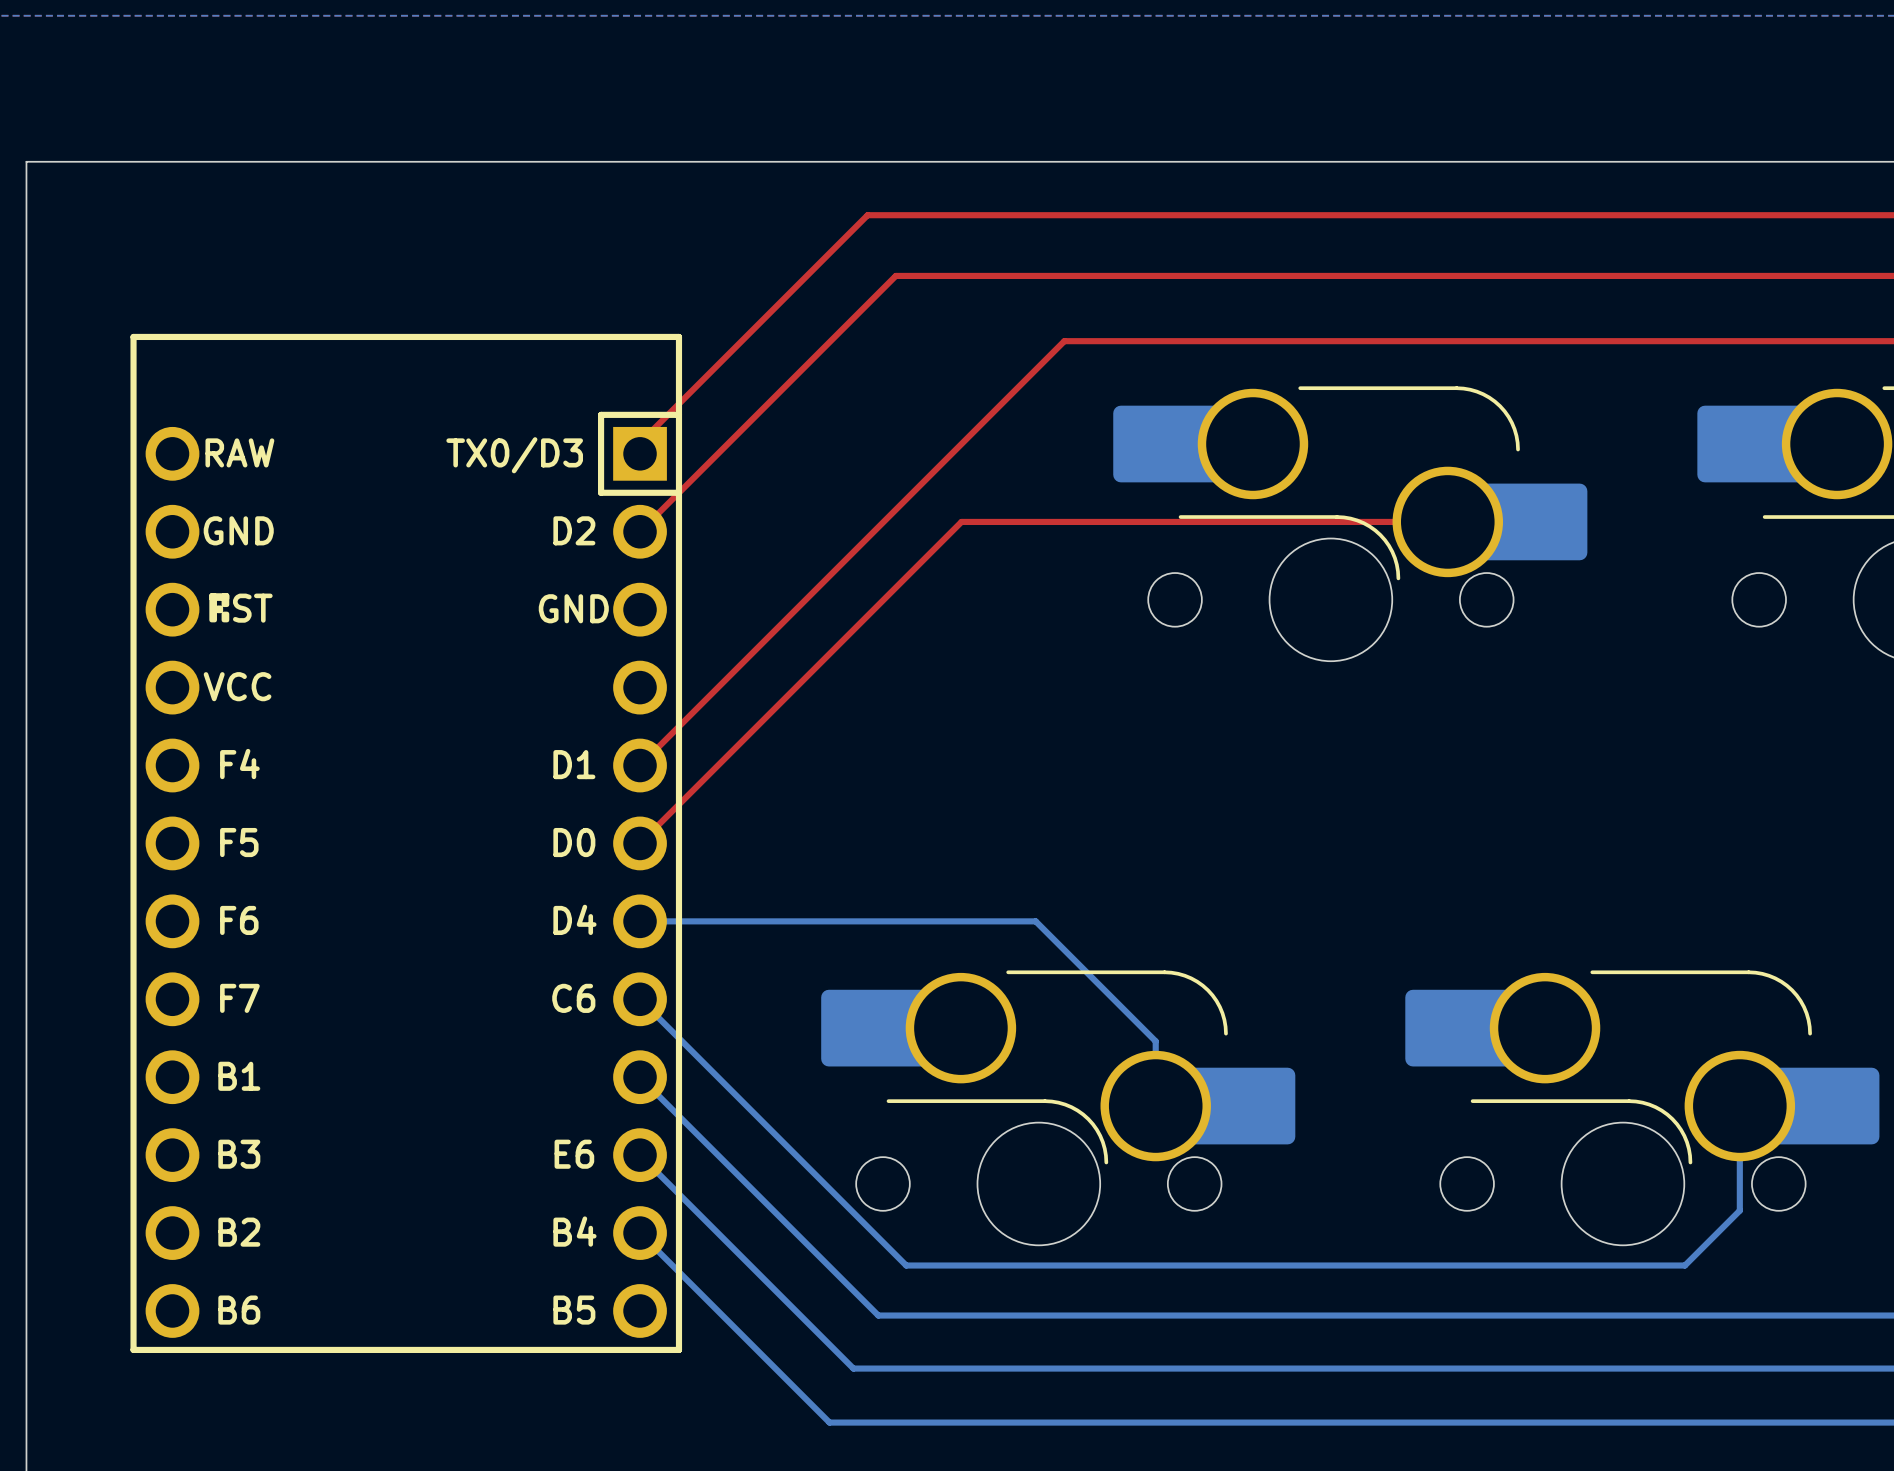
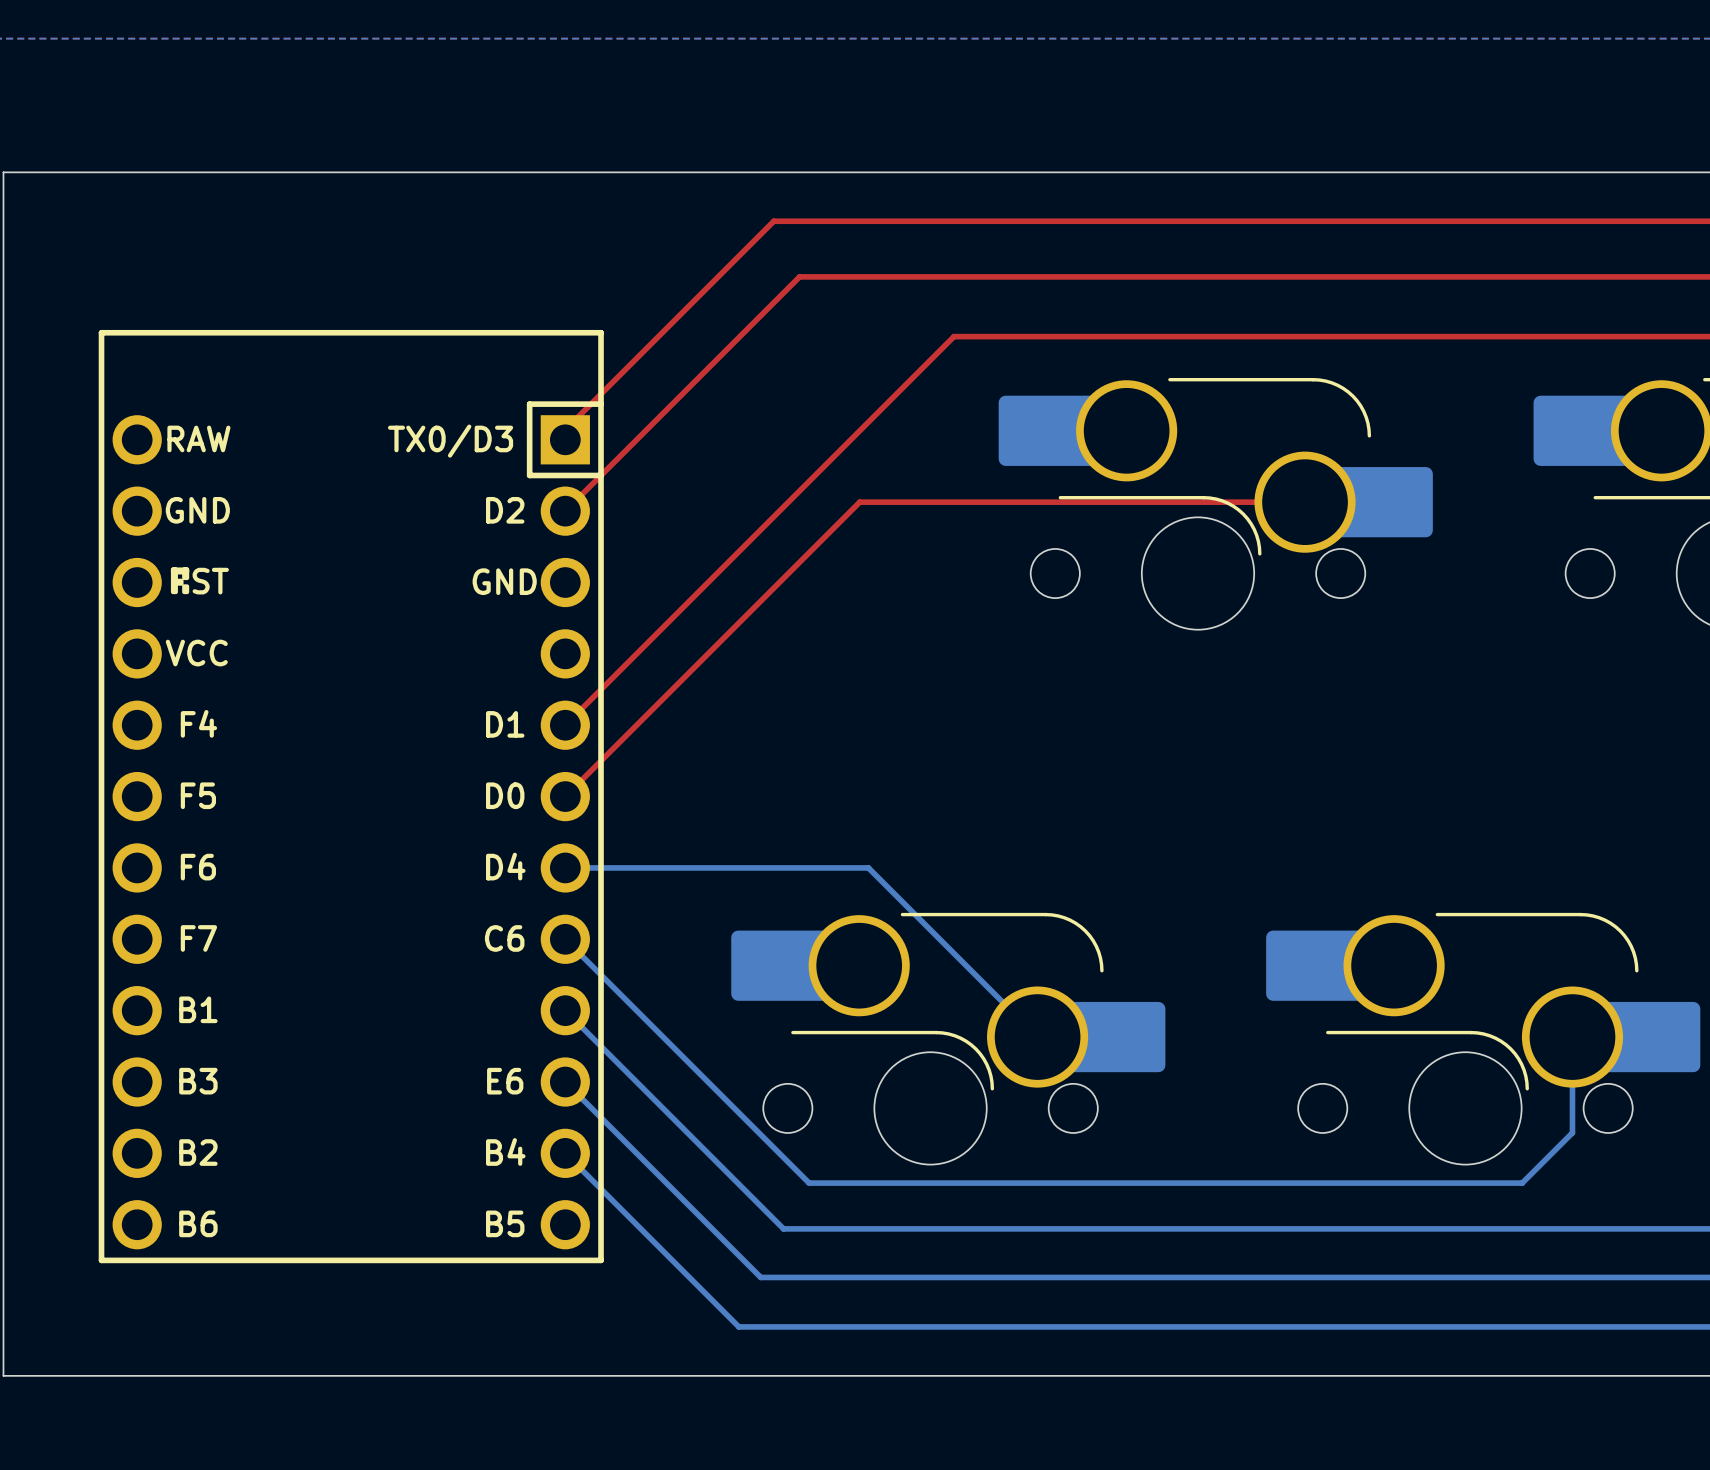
bottom track: (971, 921) (1035, 921) (1155, 1041) (1155, 1106) -> (868, 867) (1037, 1037)

